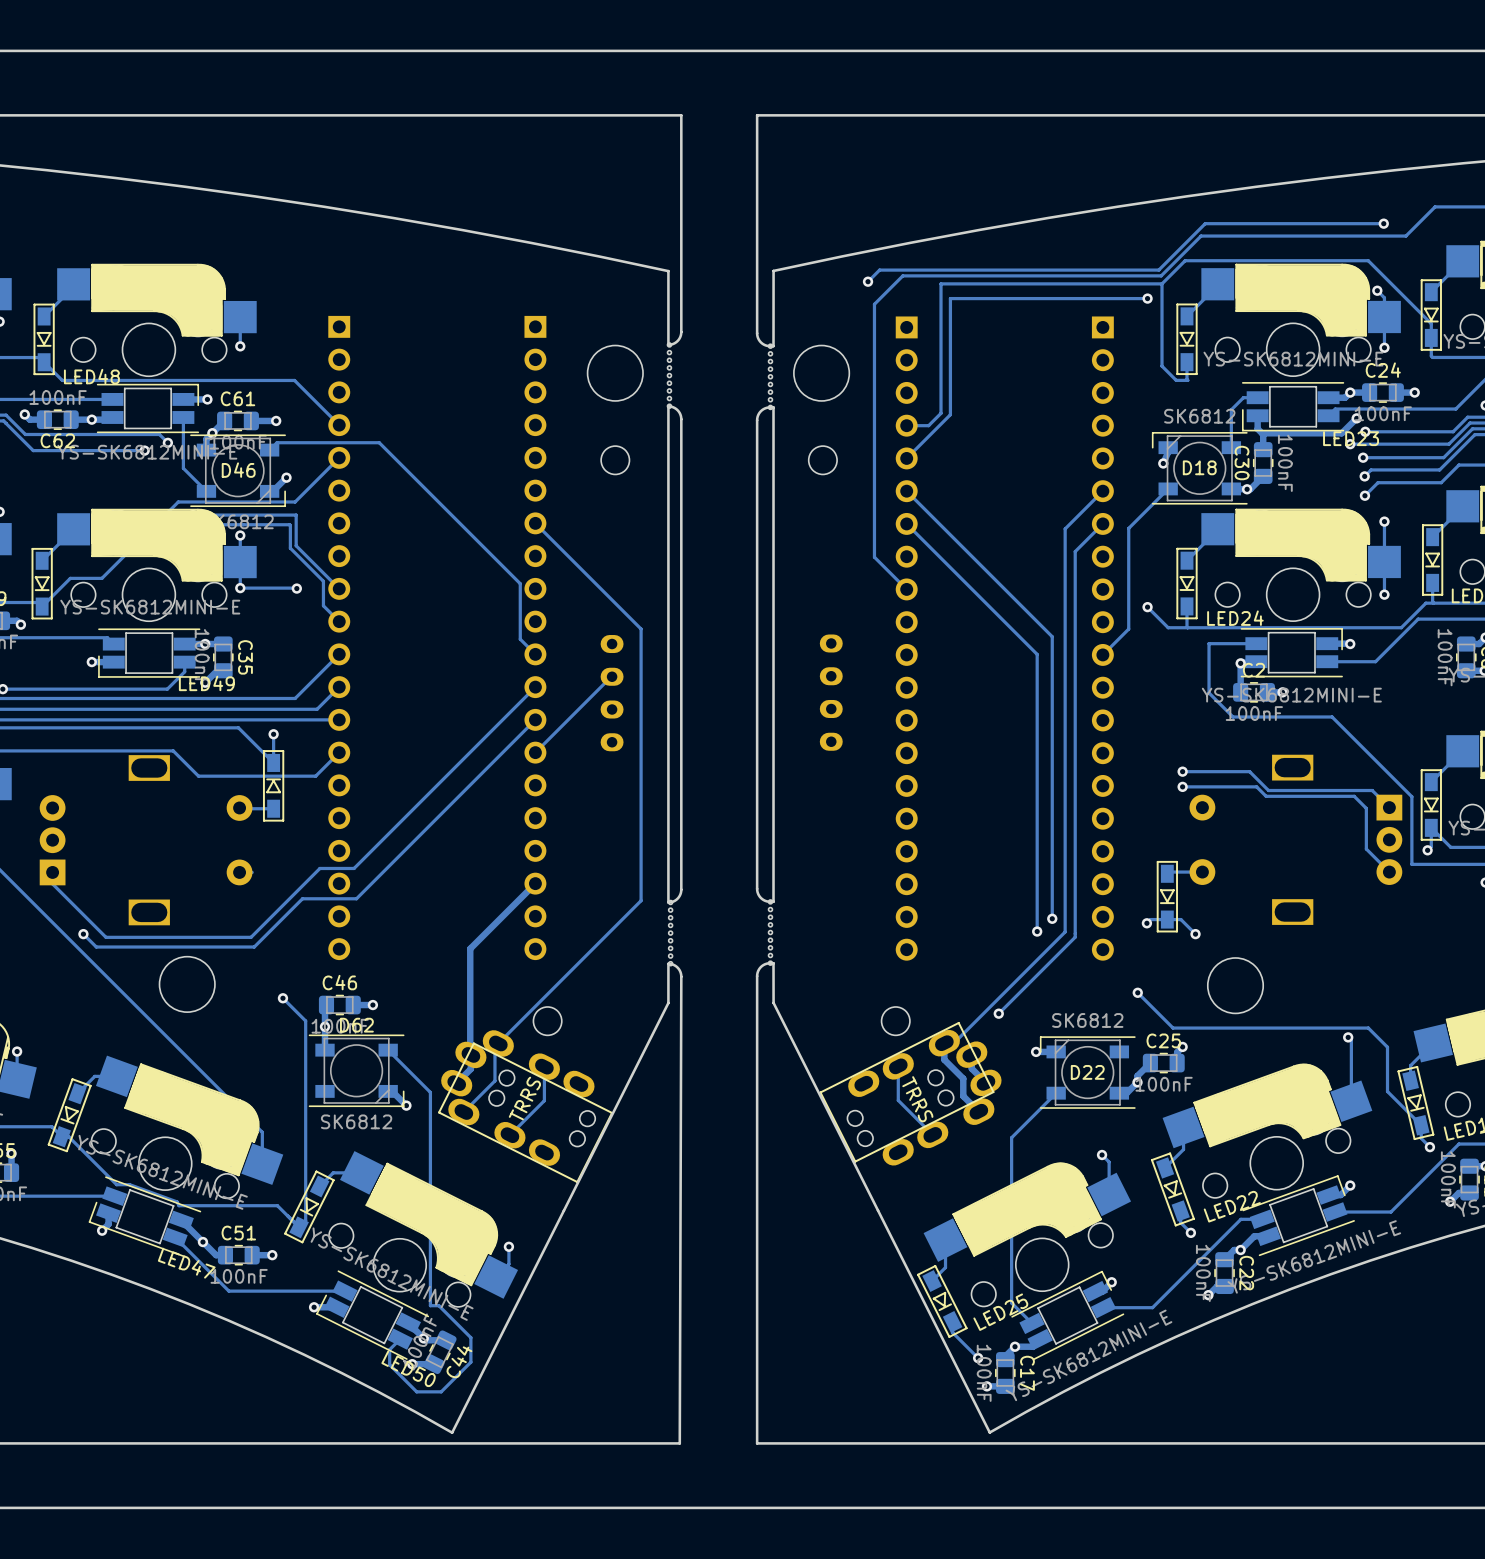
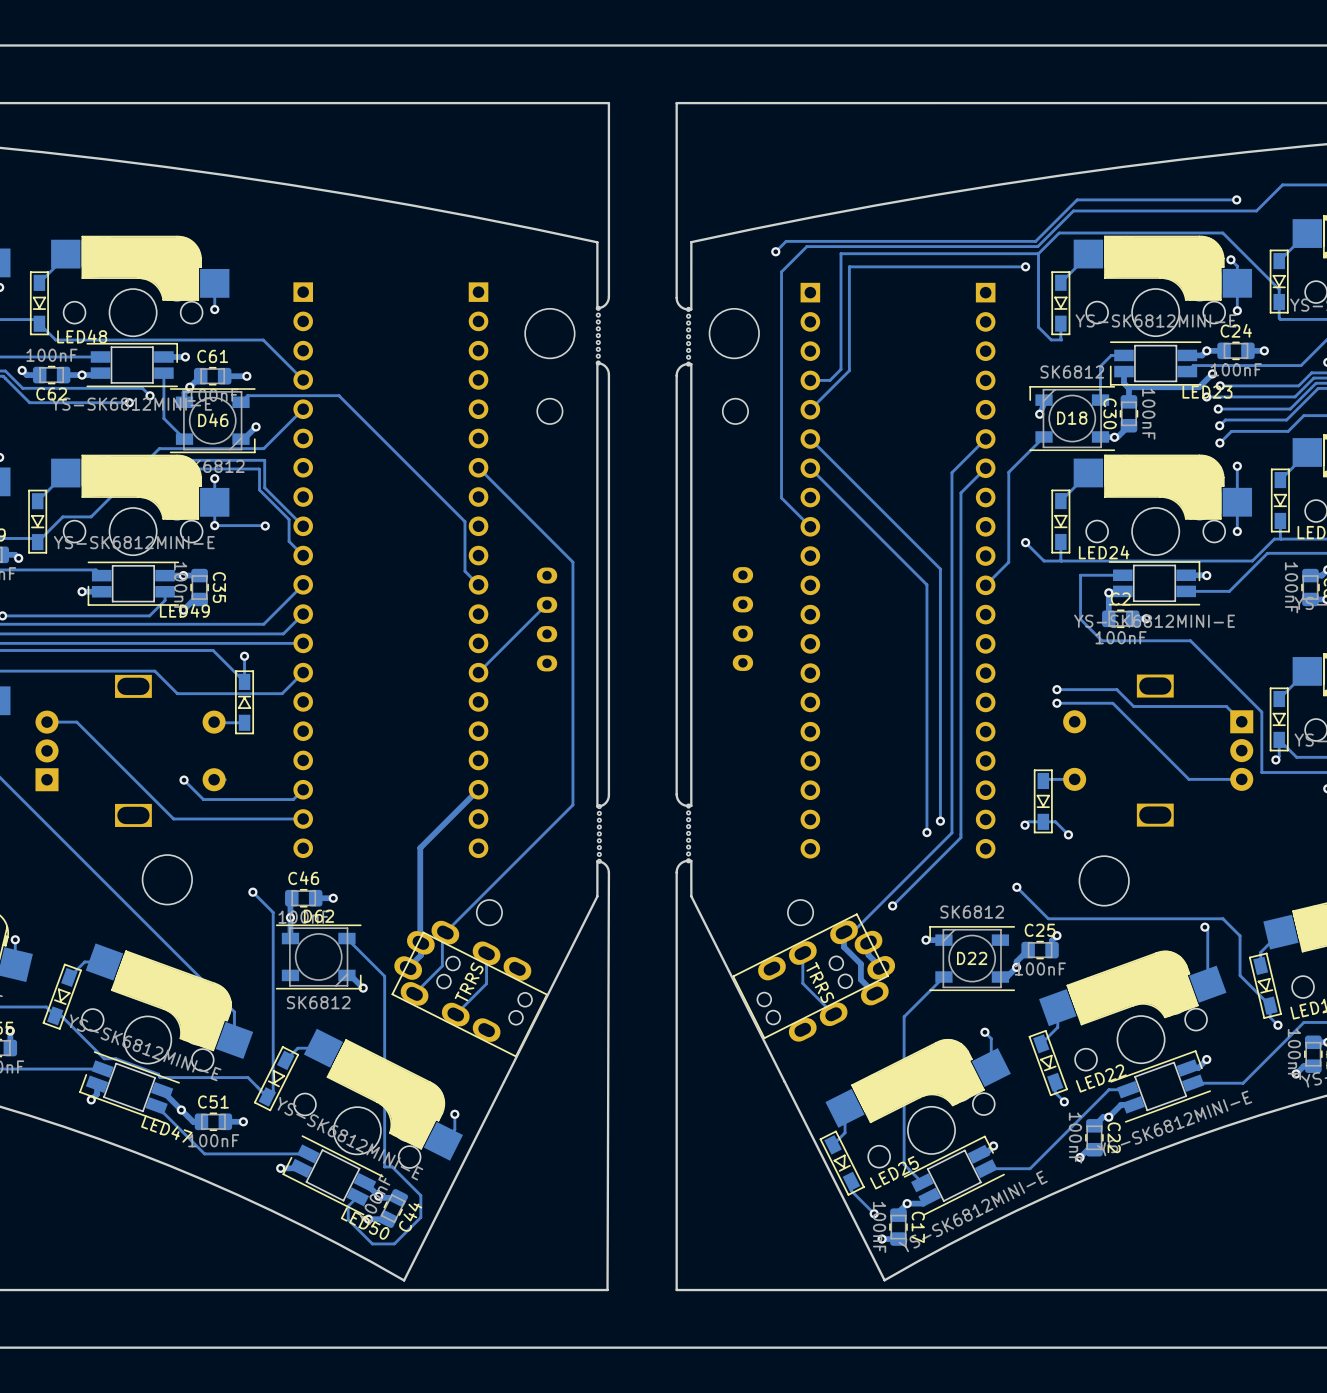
track: (535, 687) (354, 868) (319, 868) (251, 937) (105, 937) (52, 883) (52, 872) -> none
track: (535, 719) (356, 898) (302, 898) (254, 947) (96, 947) (83, 934) -> none
track: (1245, 786) (1256, 786) (1266, 796) (1354, 796) (1366, 808) (1366, 849) (1389, 872) -> (1112, 703) (1188, 779) (1241, 779)
track: none -> (47, 722) (76, 722) (173, 818) (303, 818)
track: none -> (184, 780) (203, 799) (293, 799) (303, 789)
via: none -> (184, 780)
via: (83, 934) -> none

